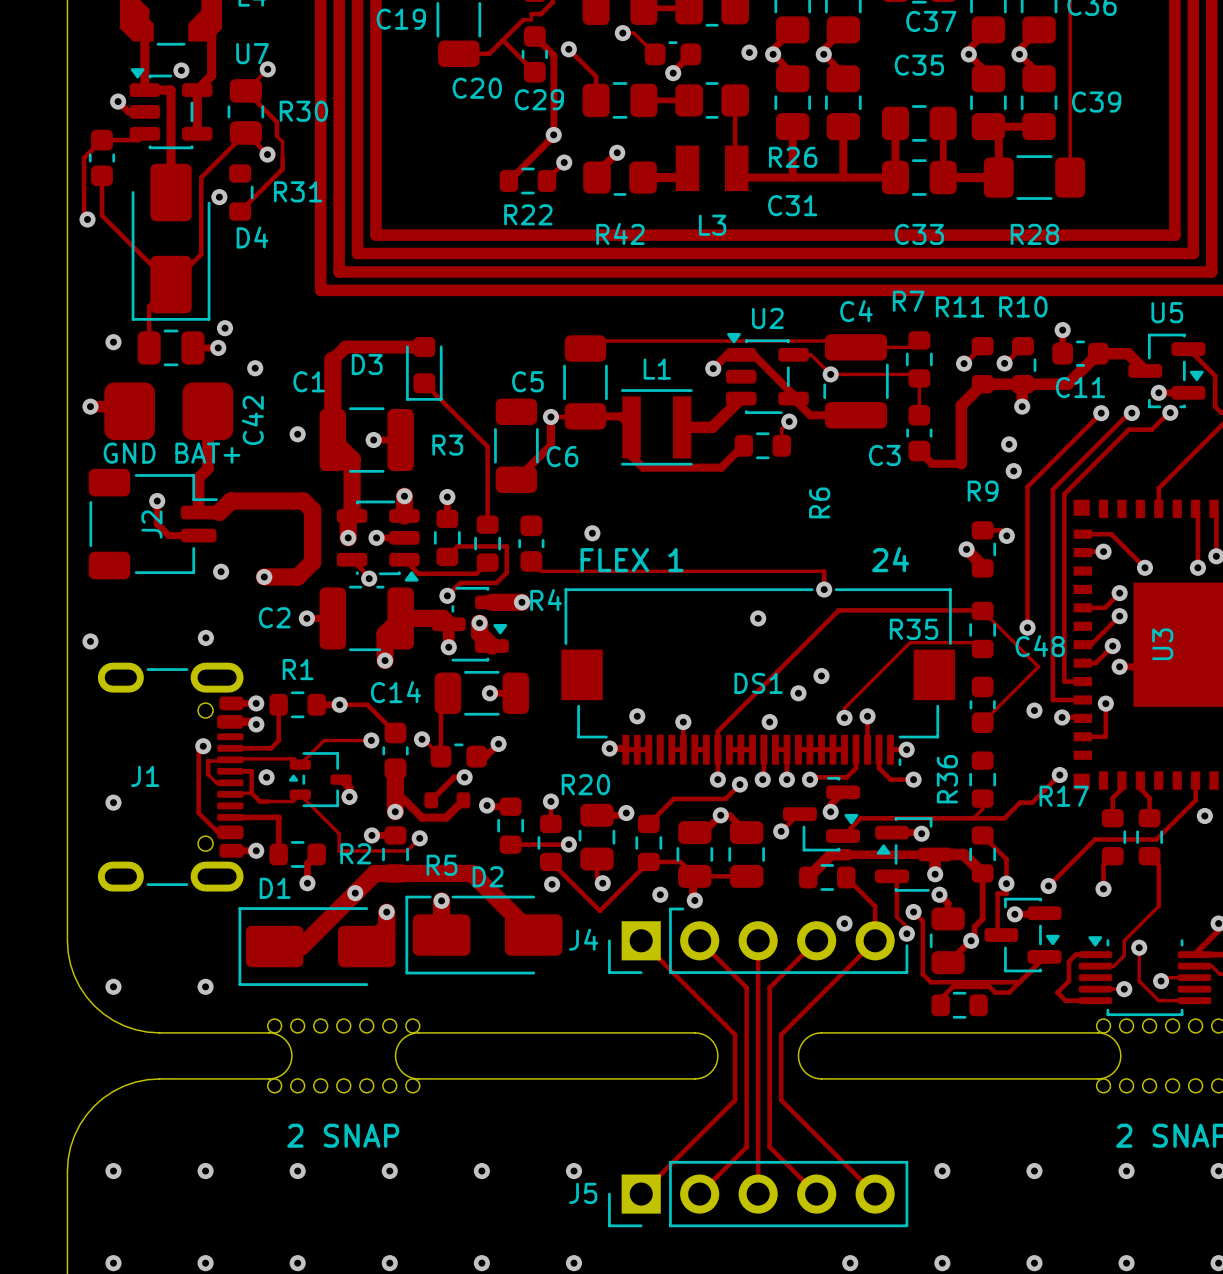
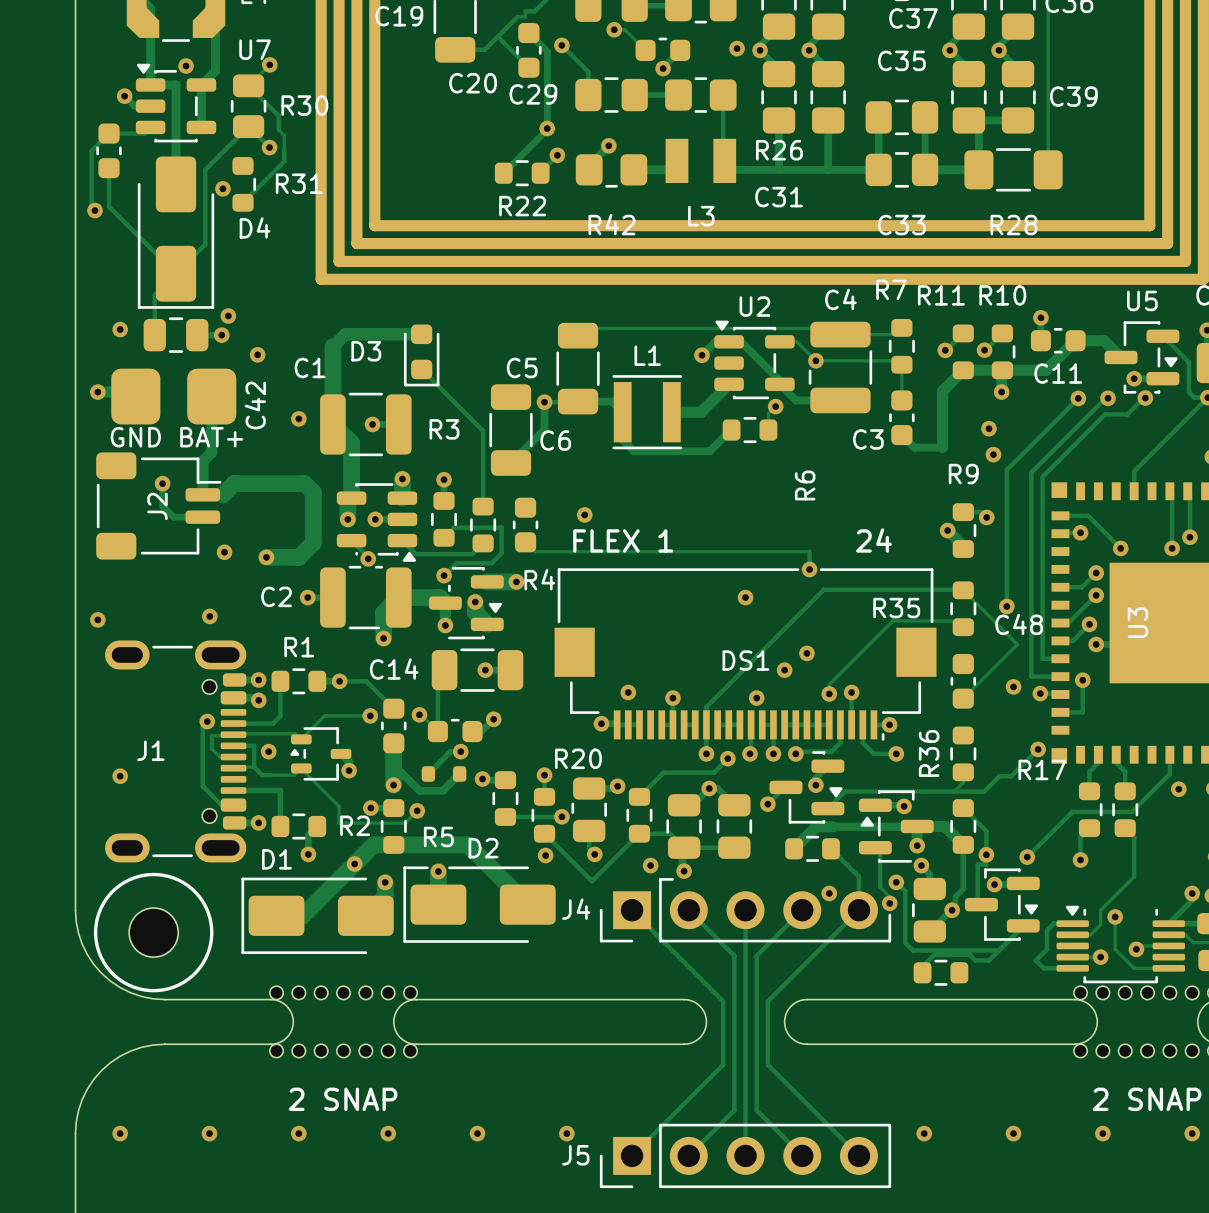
part: none -> (153, 932)
via: (113, 986) -> none
via: (205, 986) -> none

